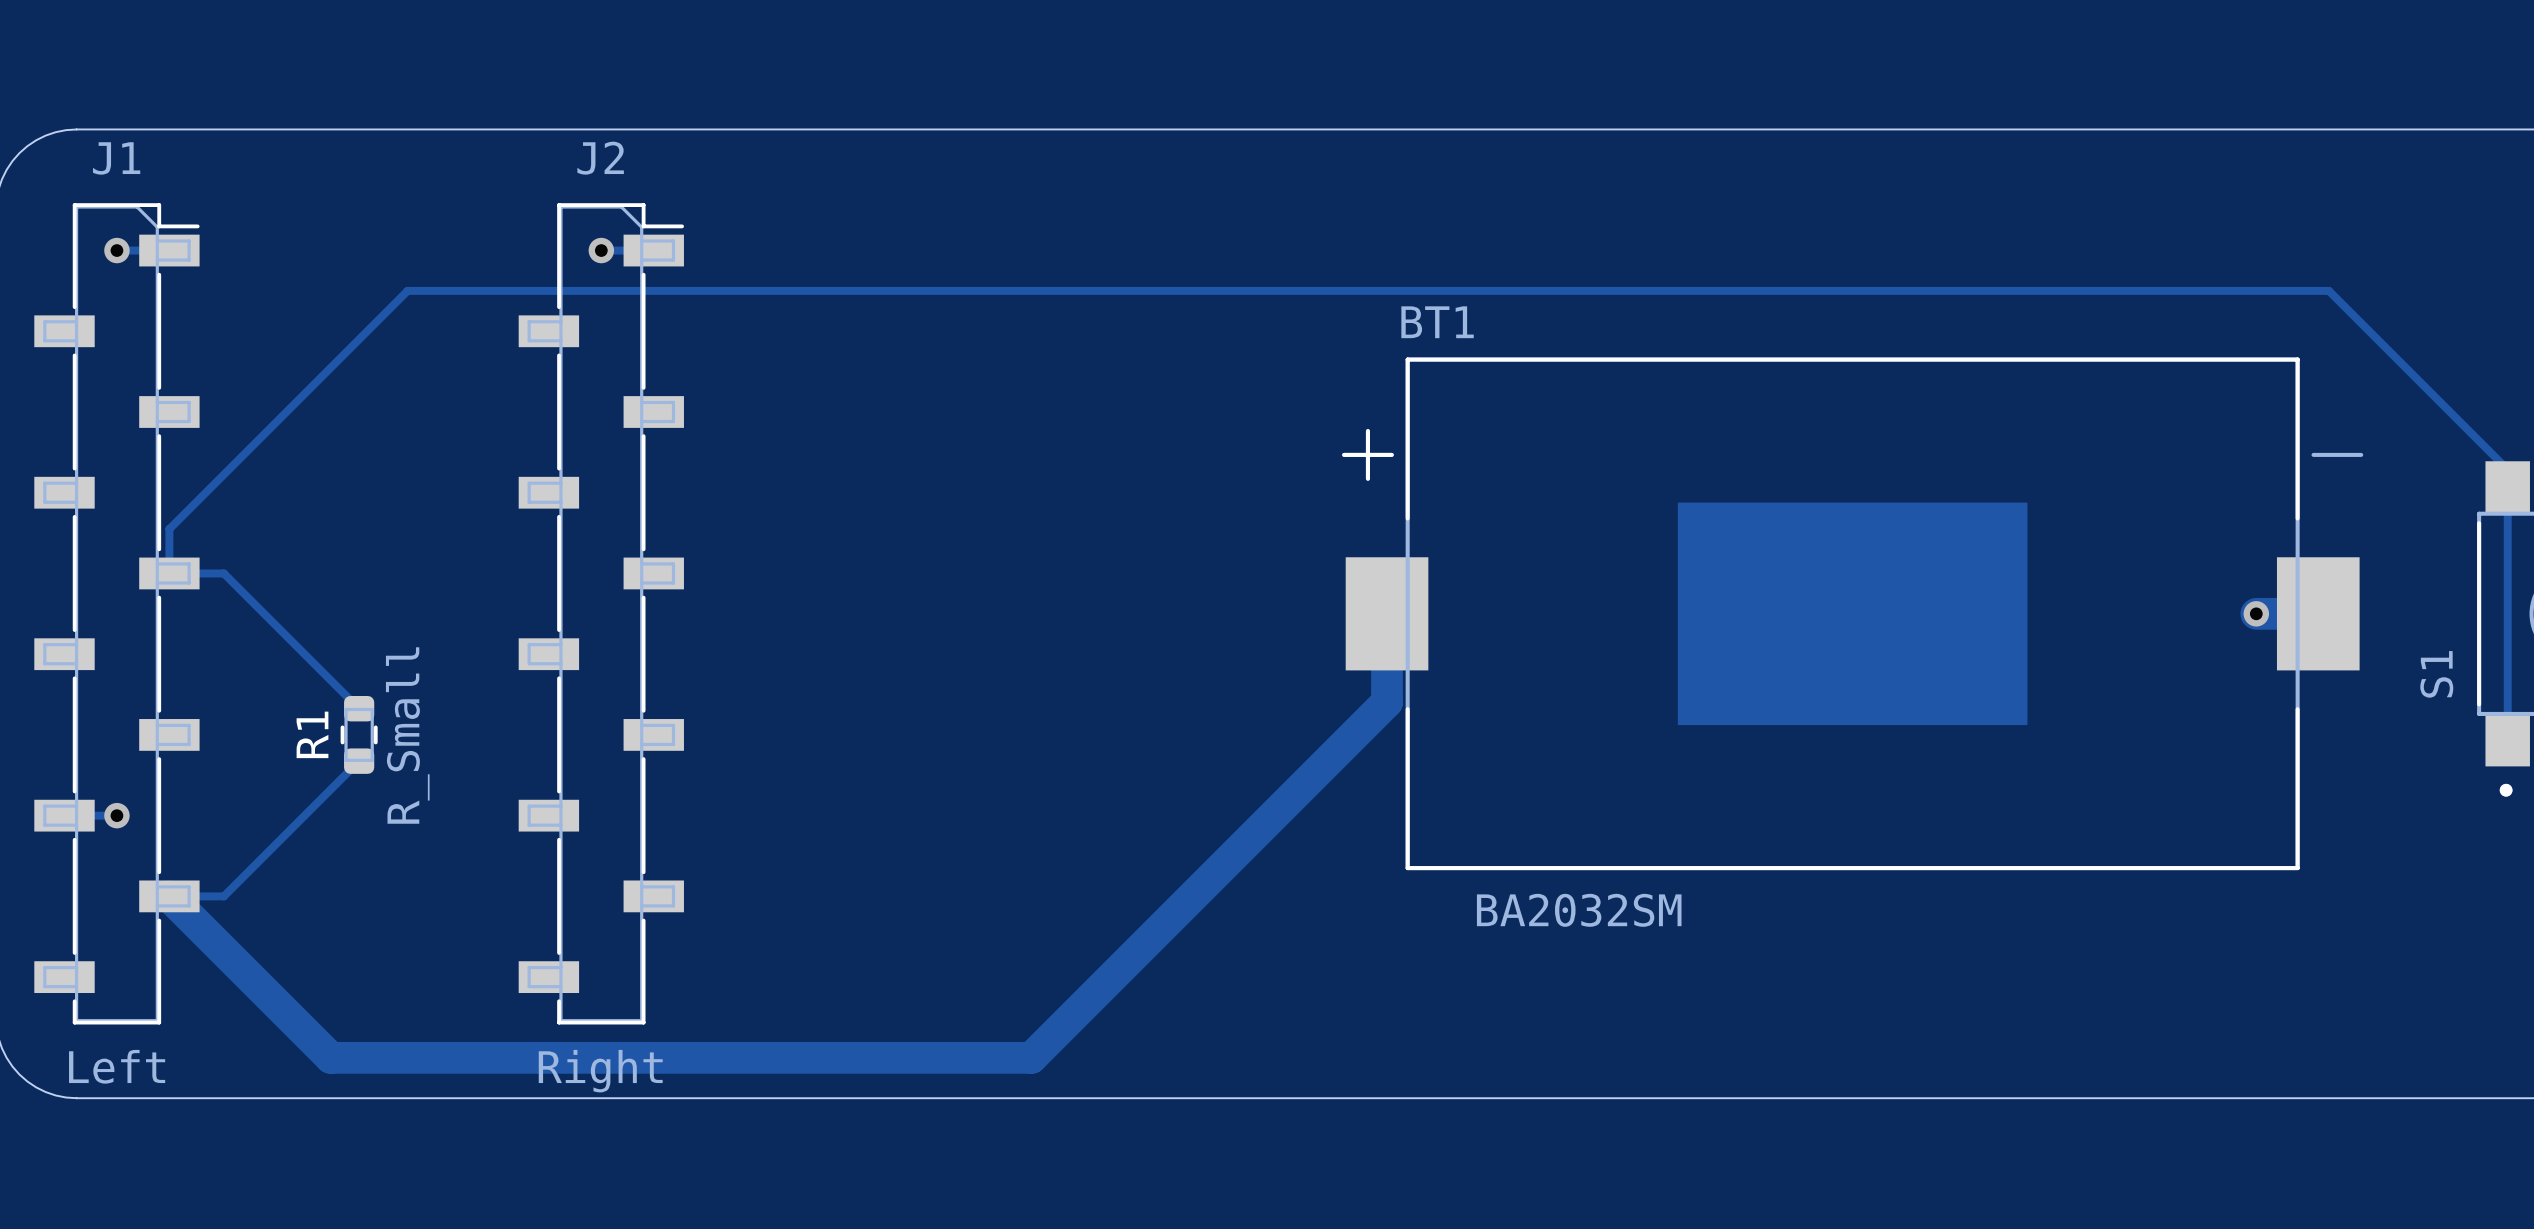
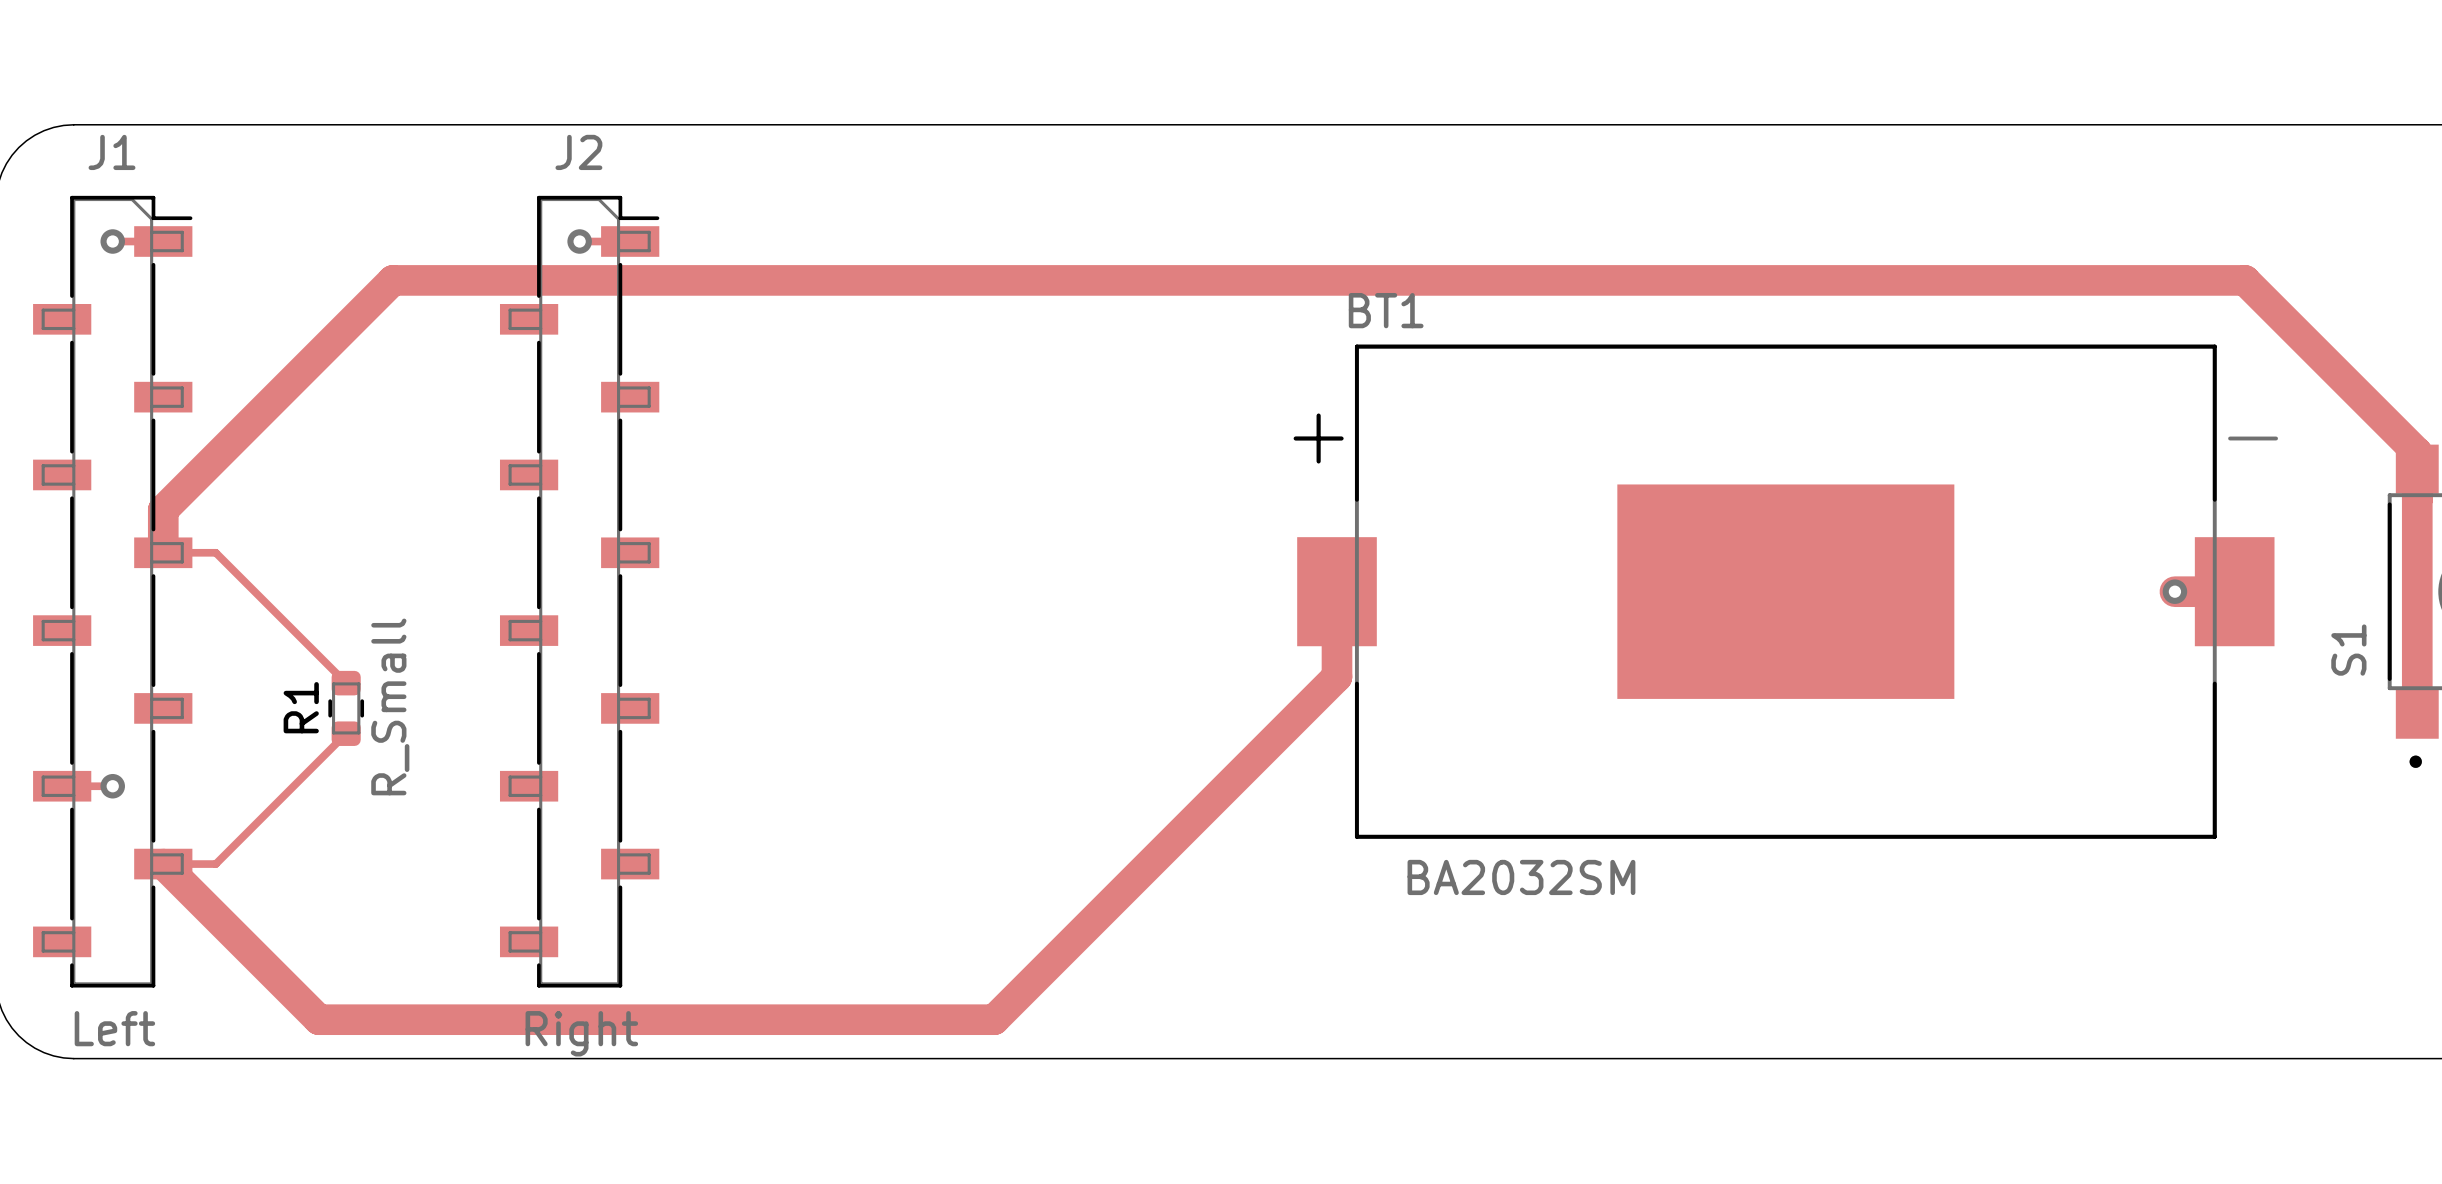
track width: thin (2507, 469) (2328, 290) (407, 290) (169, 529) (169, 573) -> thick (2417, 452) (2244, 280) (392, 280) (163, 510) (163, 552)
track width: thin (2507, 486) (2507, 740) -> thick (2417, 469) (2417, 714)

